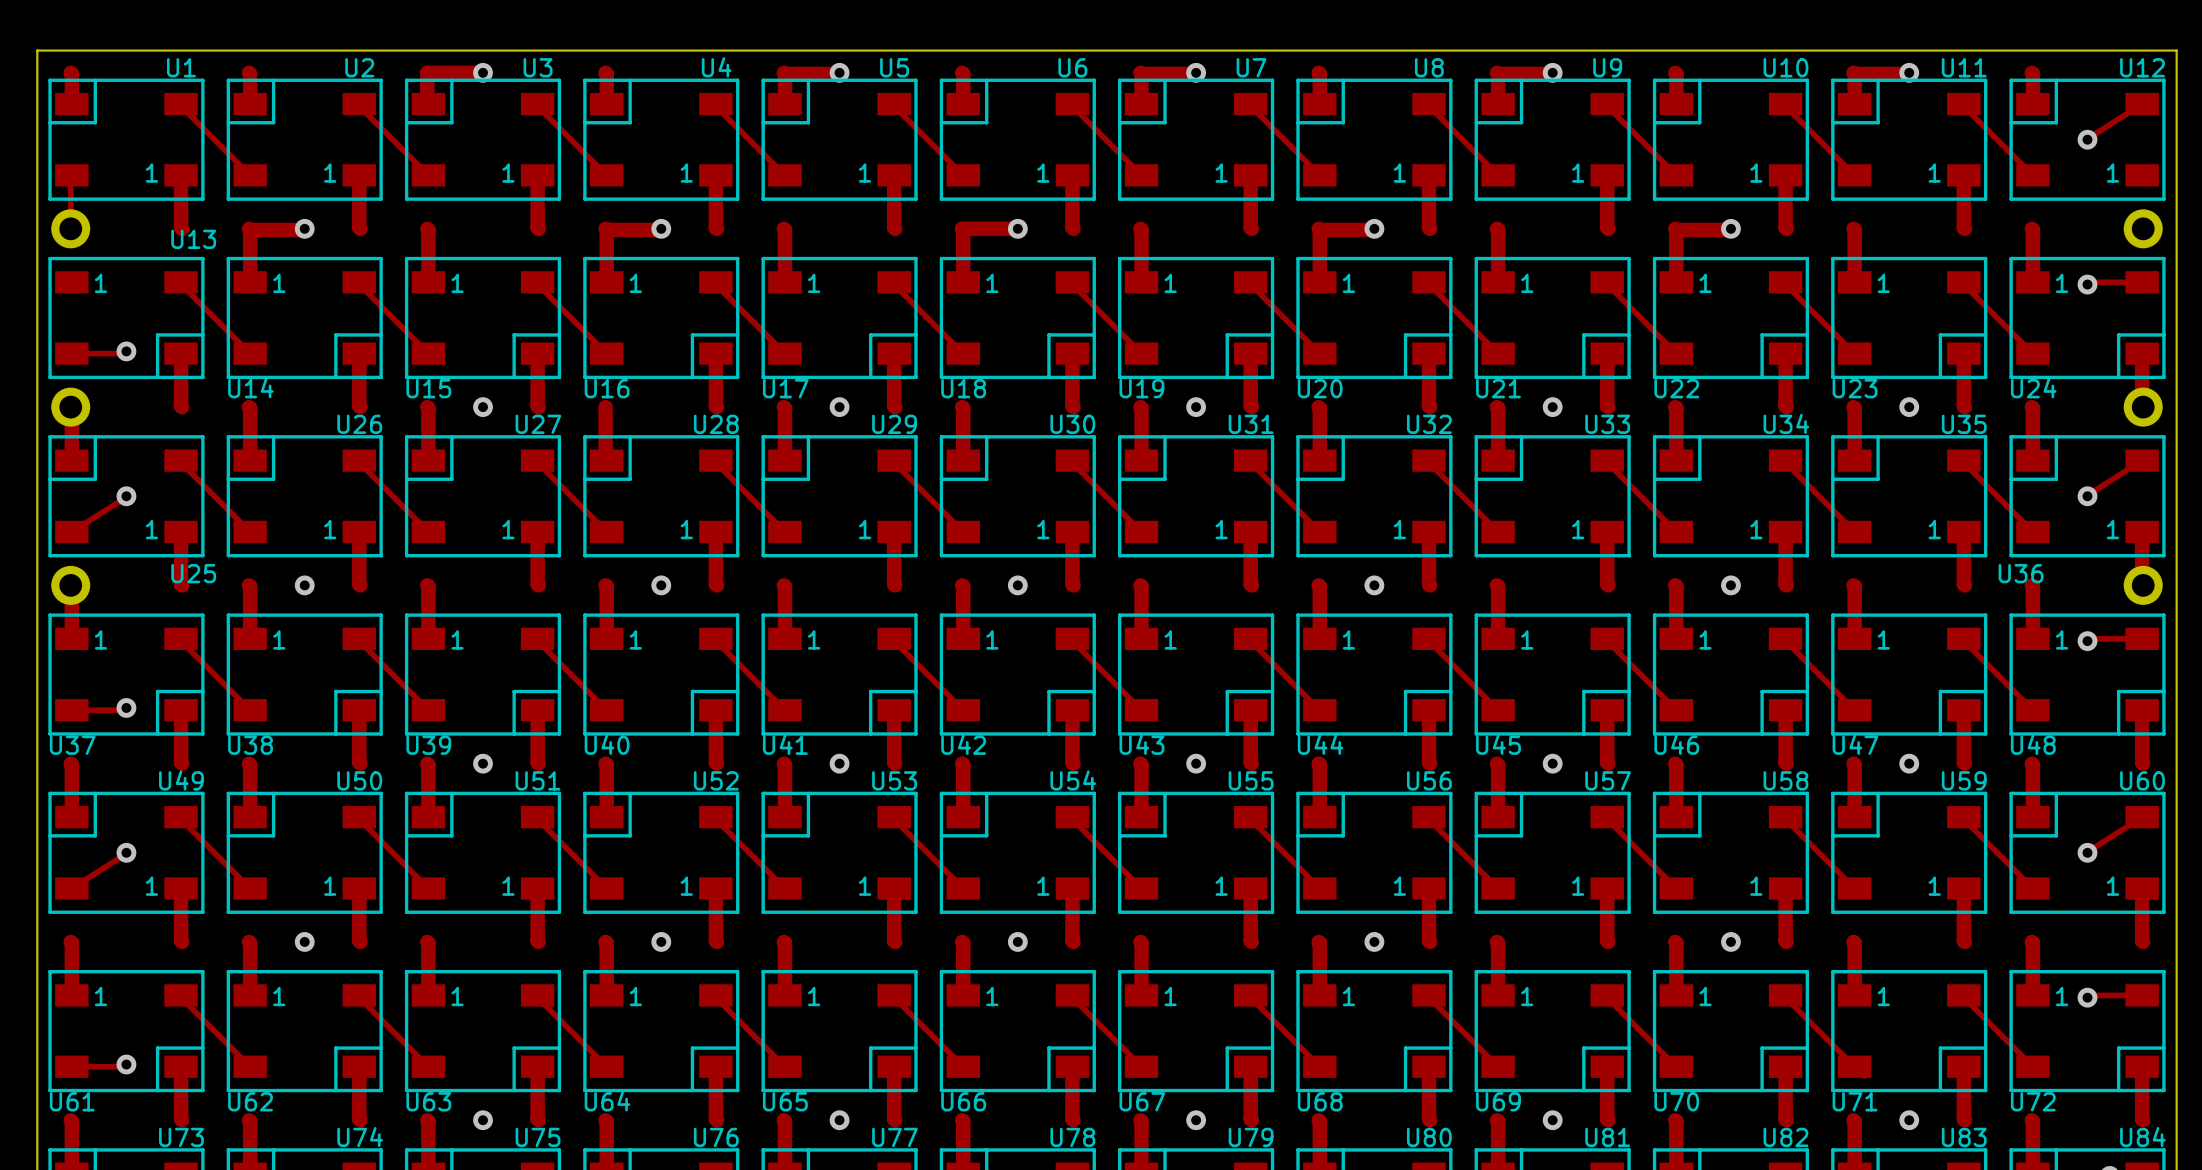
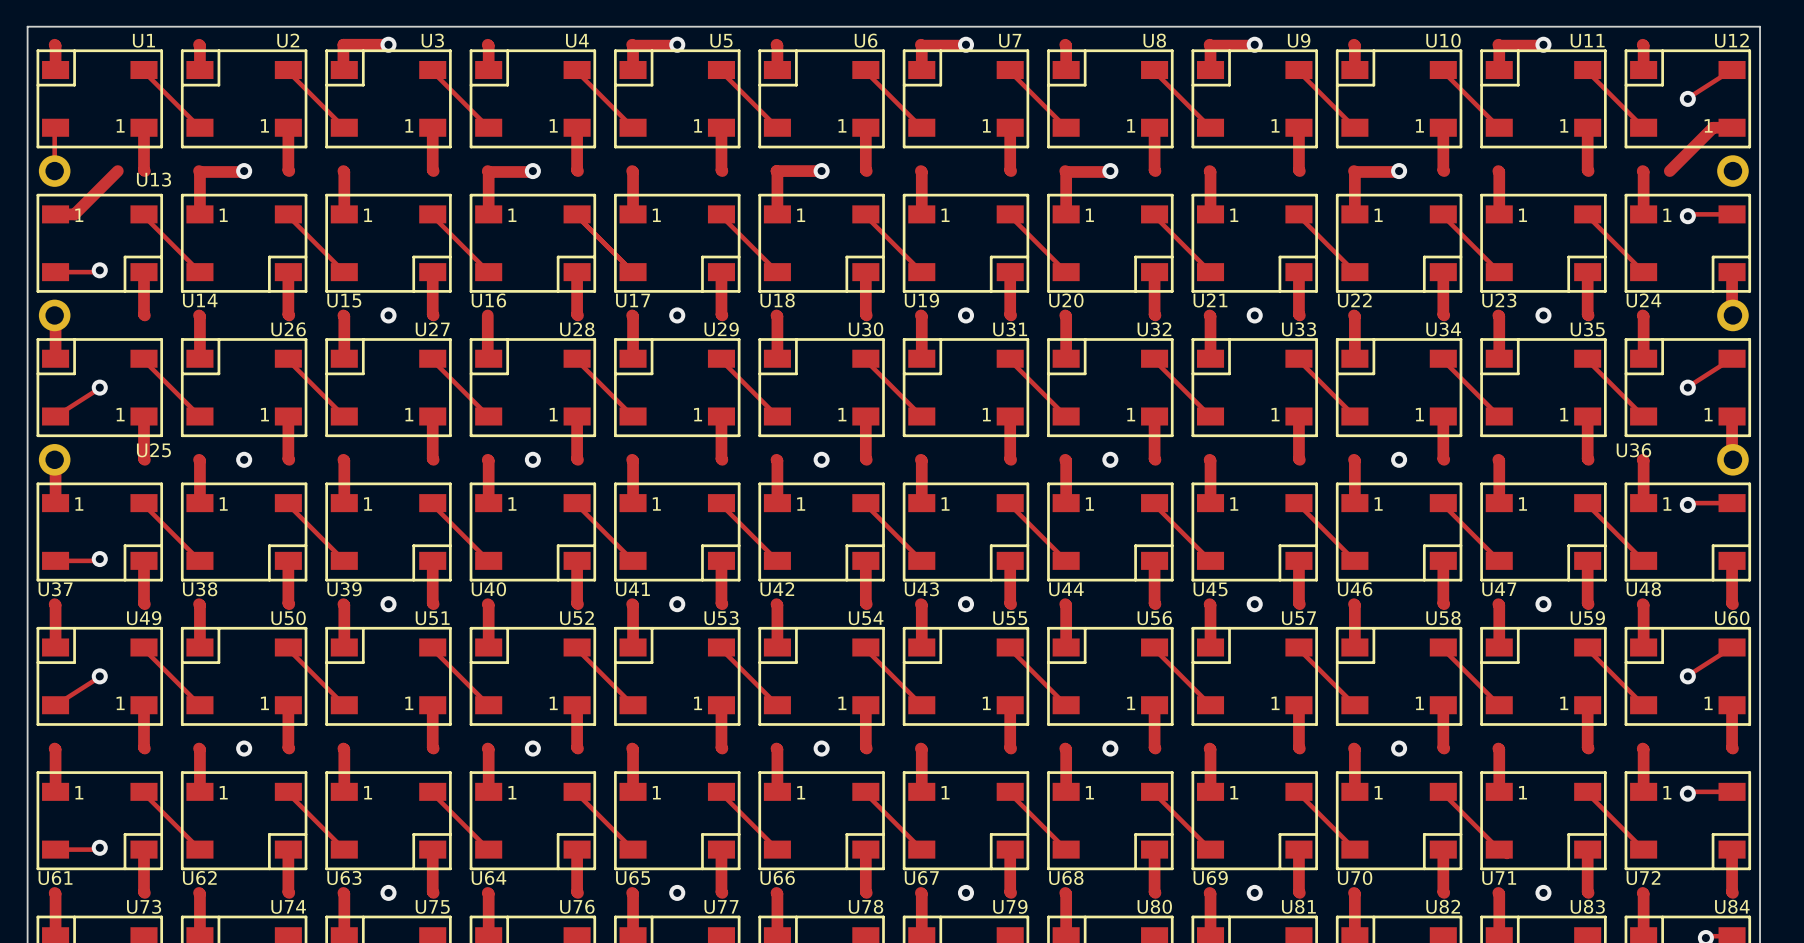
track: none -> (1732, 127) (1713, 127) (1669, 171)
track: none -> (117, 171) (74, 214) (55, 214)

